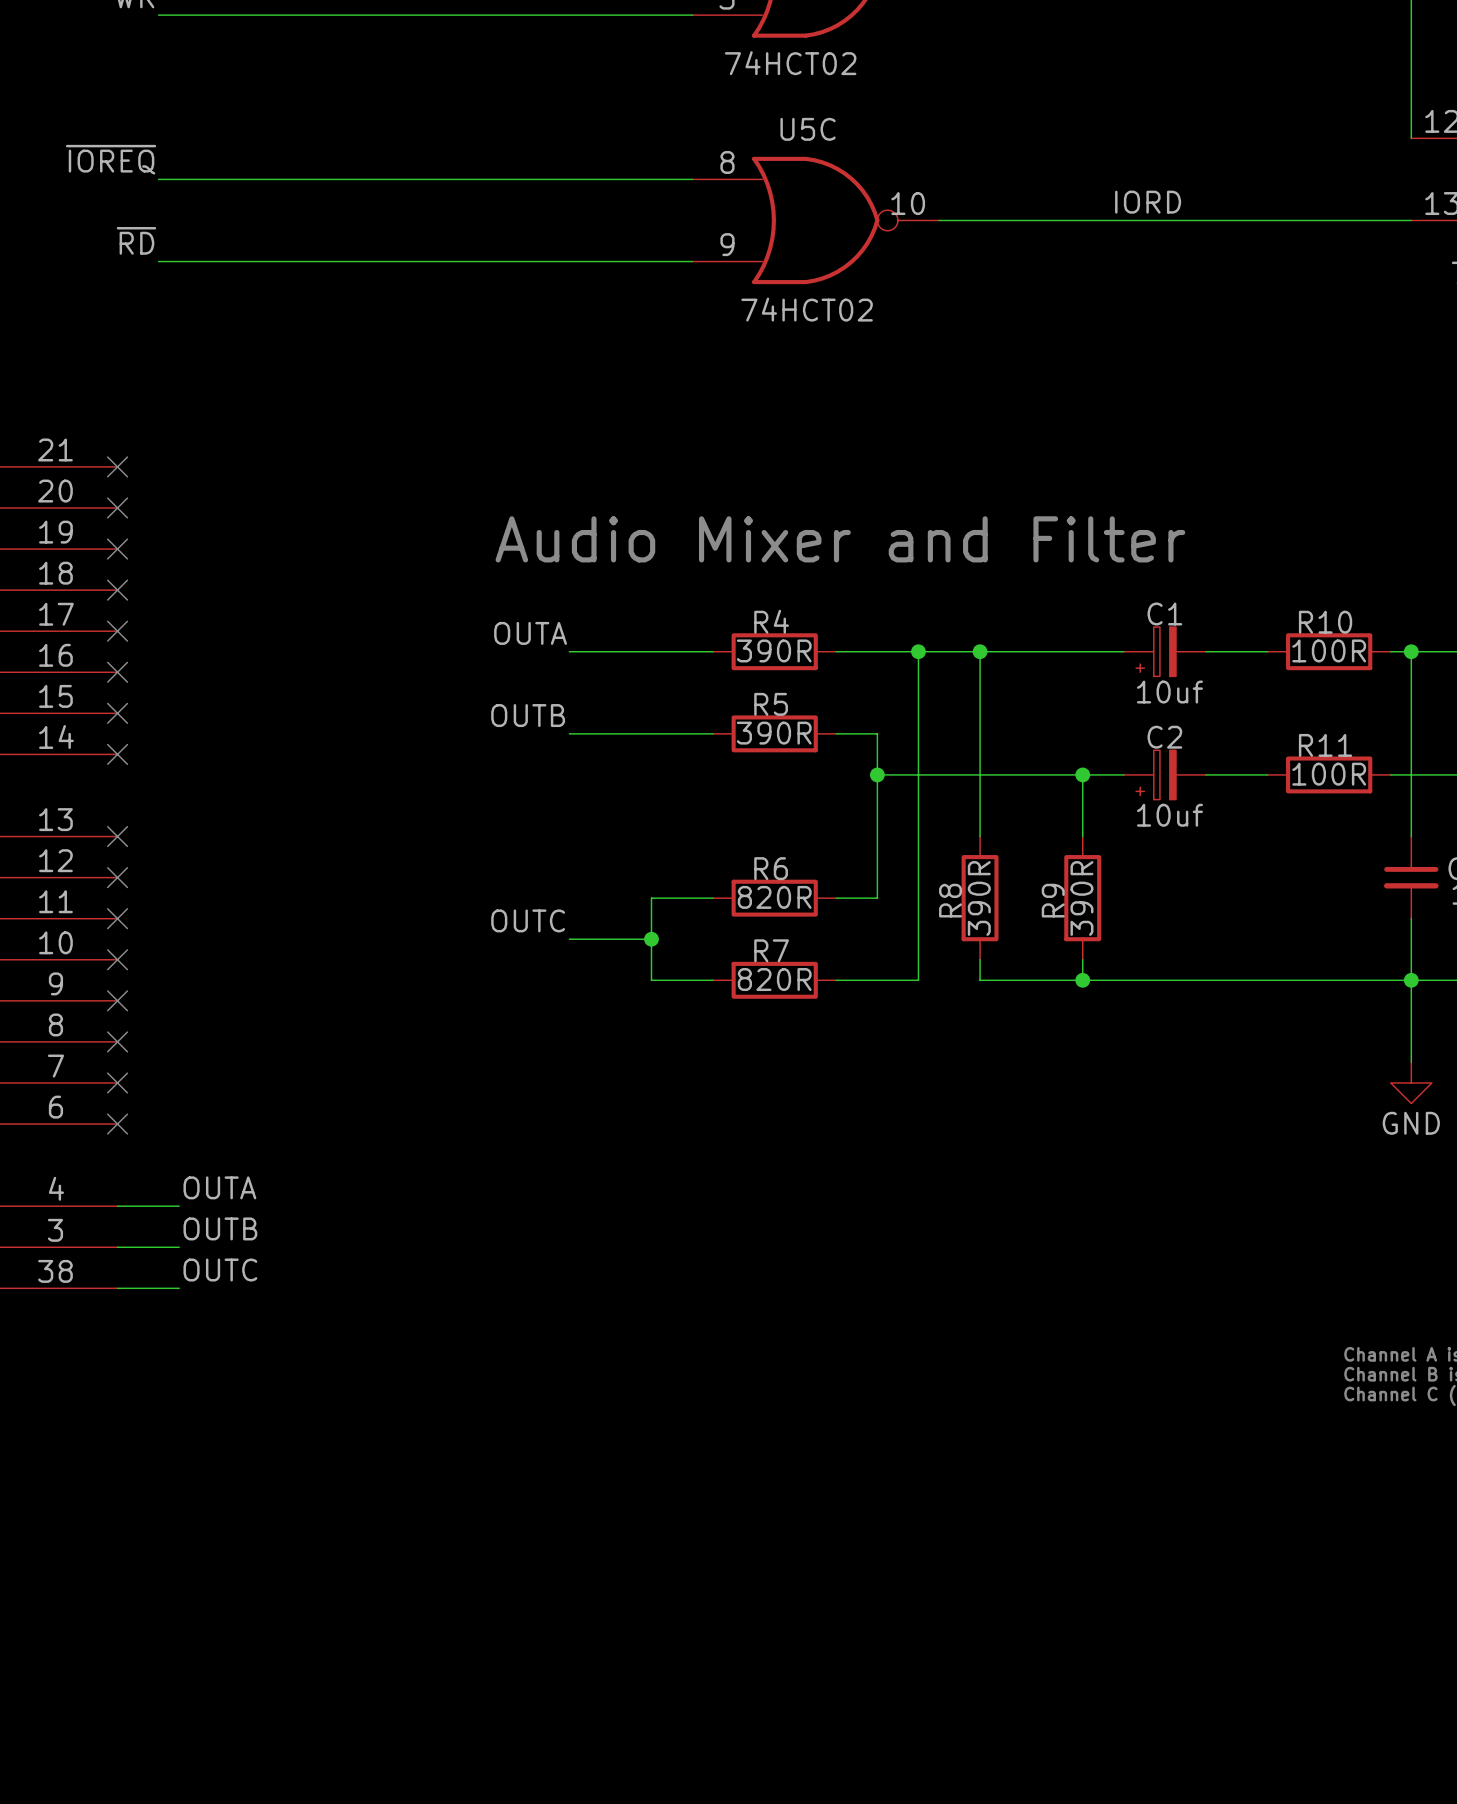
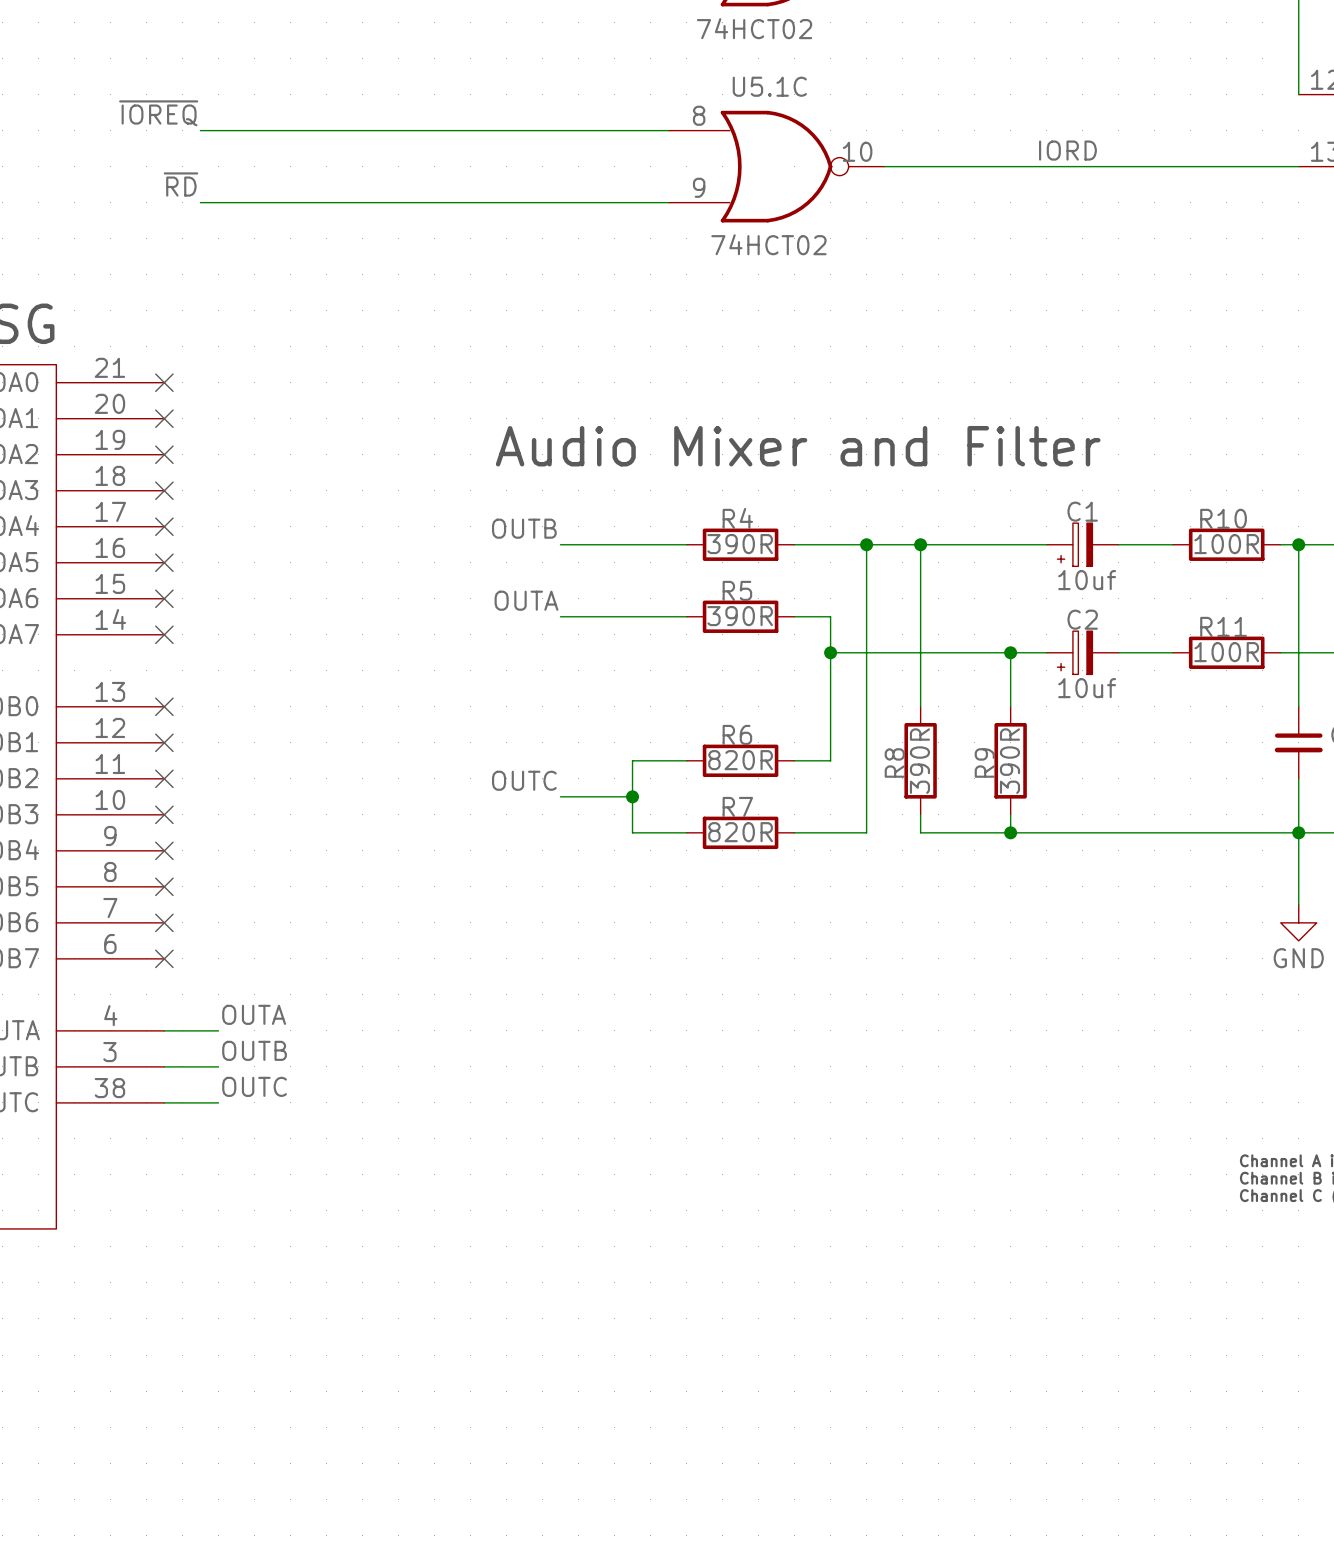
U5C name: U5C (808, 129) -> U5.1C (769, 86)
label: OUTA (530, 633) -> OUTB (524, 528)
label: OUTB (528, 715) -> OUTA (526, 600)

